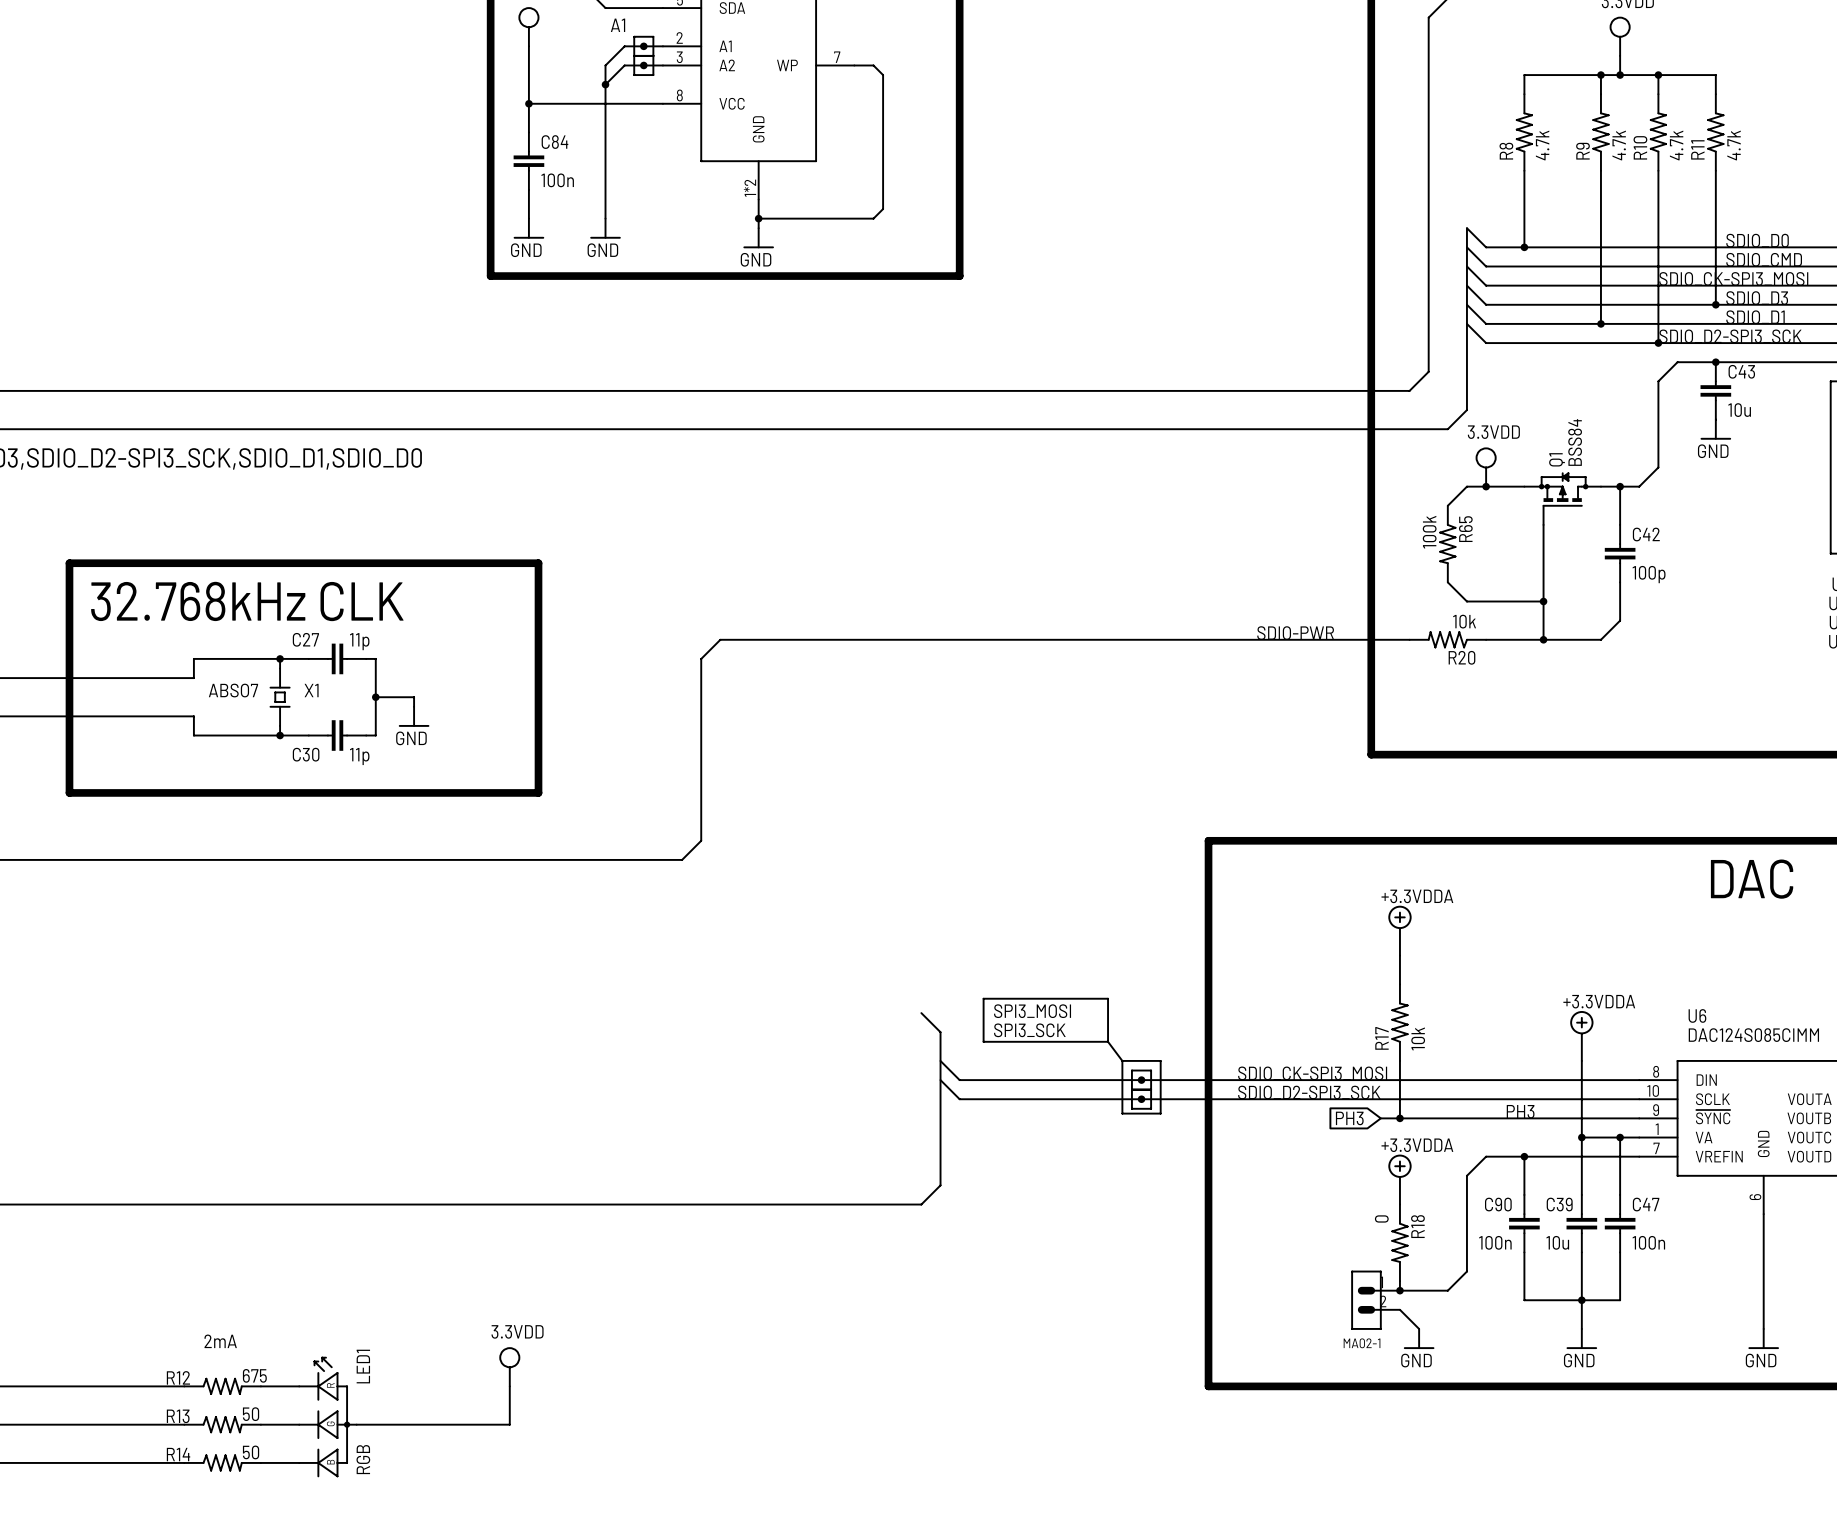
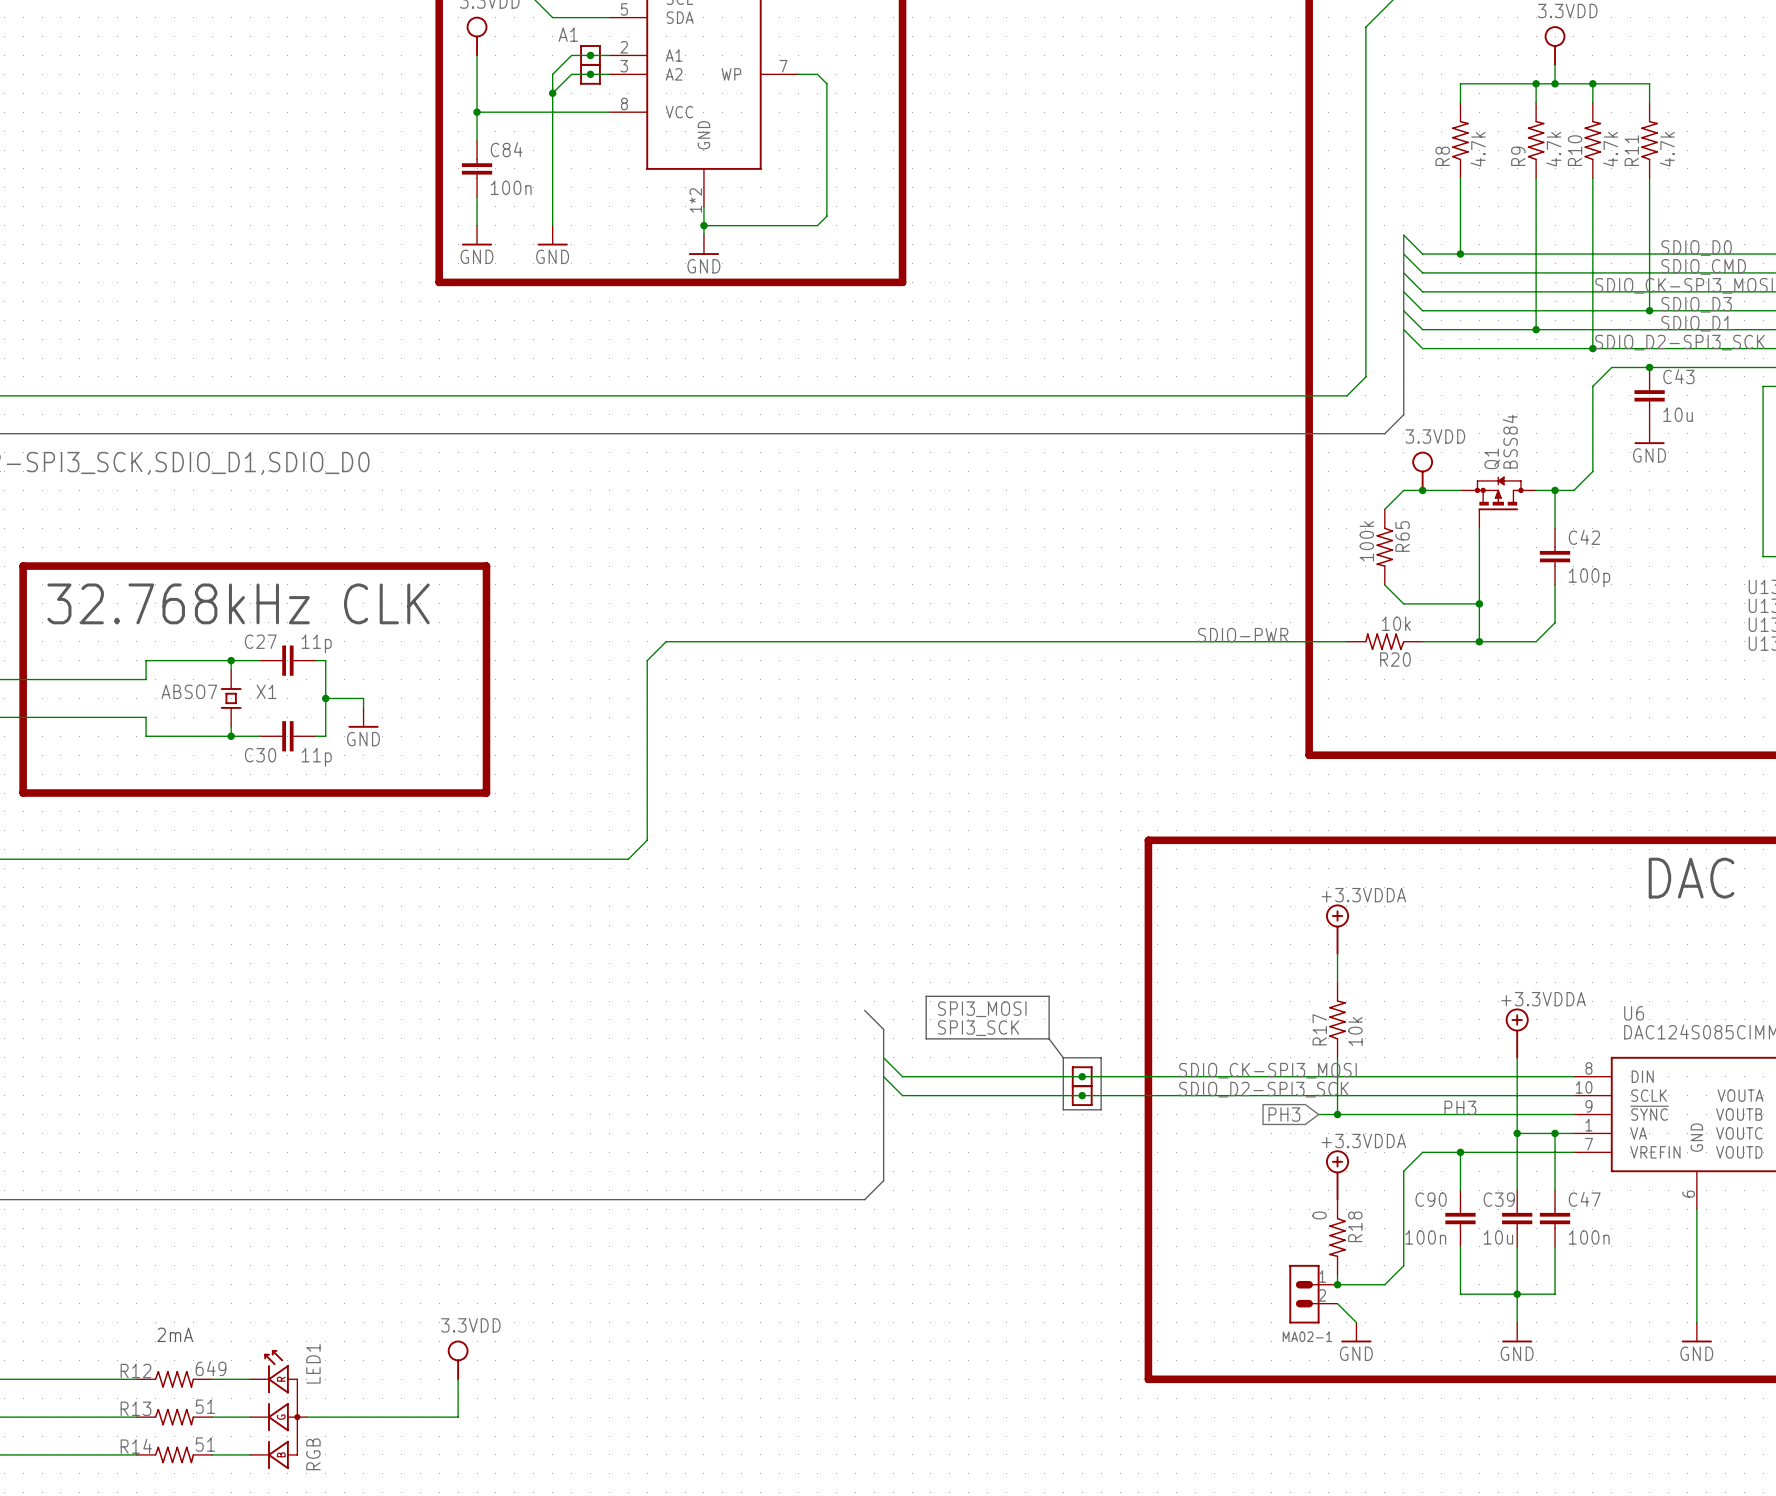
R12 value: 675 (254, 1375) -> 649 (211, 1368)
R13 value: 50 (251, 1414) -> 51 (205, 1406)
R14 value: 50 (251, 1452) -> 51 (205, 1444)

